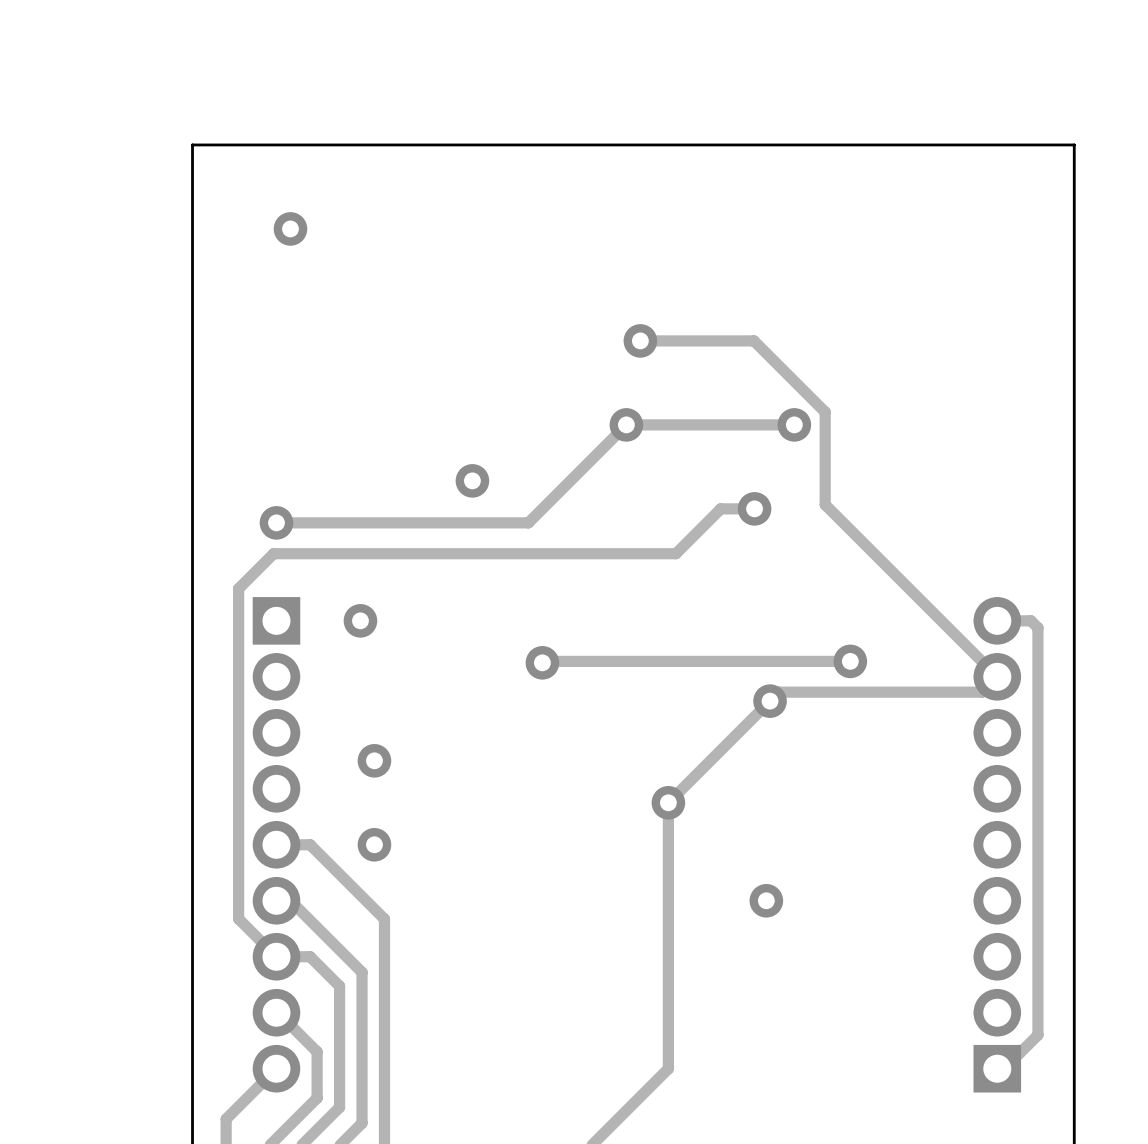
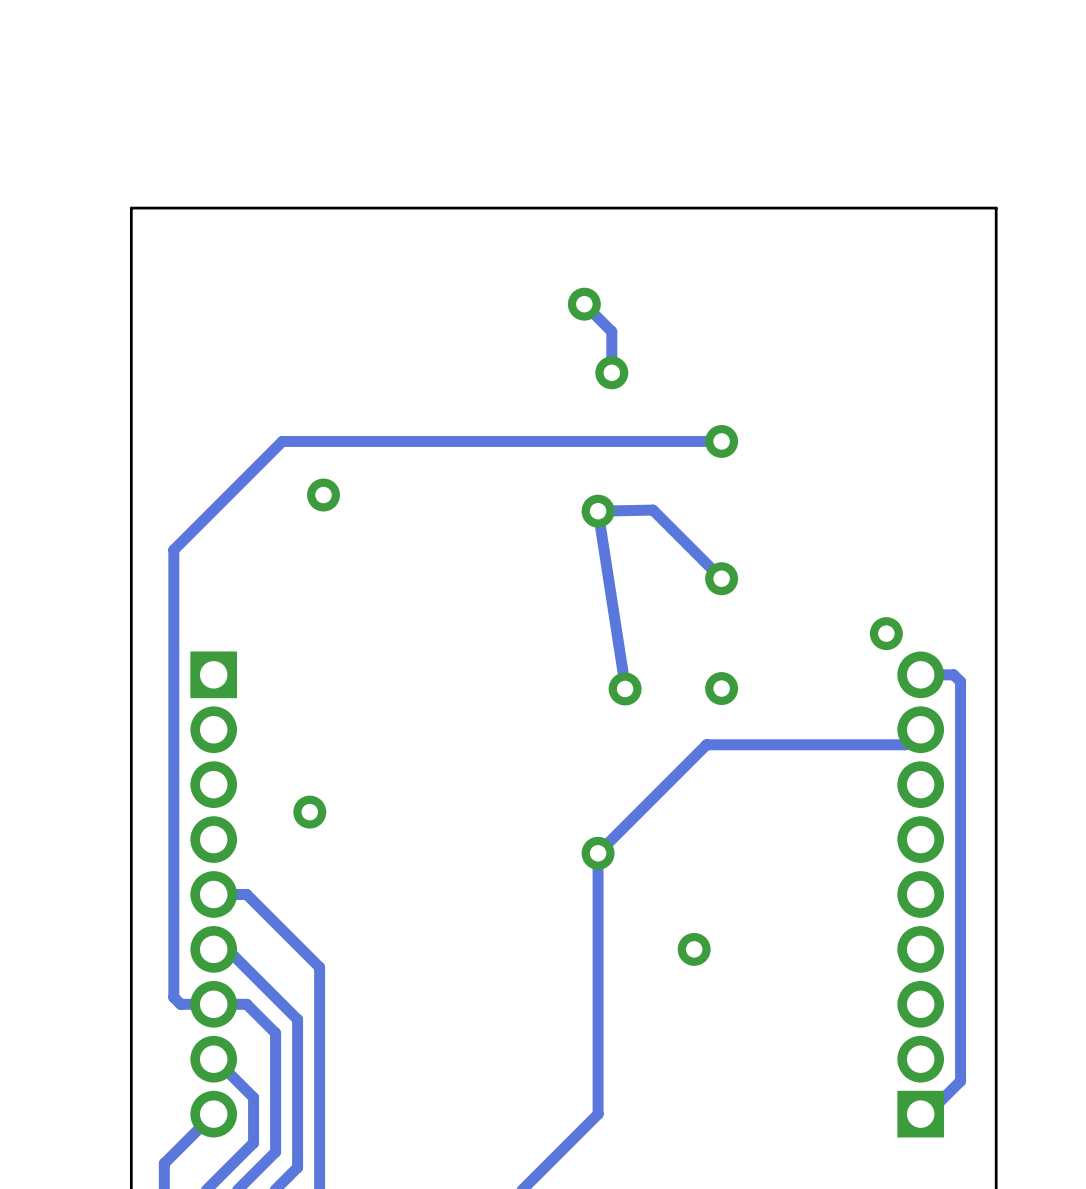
via: (290, 228) -> none
track: none -> (584, 304) (611, 331) (611, 372)
via: none -> (584, 304)
via: none -> (611, 372)
track: (640, 340) (753, 340) (825, 412) (825, 504) (997, 676) -> none
via: (640, 340) -> none
via: (626, 424) -> none
track: (794, 424) (626, 424) (528, 522) (276, 522) -> none
via position: (794, 424) -> (721, 441)
via: none -> (323, 495)
via: none -> (598, 511)
via: (472, 480) -> none
track: (754, 508) (720, 508) (675, 553) (273, 553) (238, 588) (238, 918) (276, 956) -> (721, 441) (282, 441) (173, 549) (173, 997) (180, 1004) (213, 1004)
via position: (754, 508) -> (721, 578)
via: (276, 522) -> none
track: none -> (721, 578) (652, 510) (598, 511) (625, 688)
via: none -> (886, 633)
via: (360, 620) -> none
via: none -> (721, 688)
via: none -> (625, 688)
track: (850, 661) (542, 662) -> none
via: (850, 661) -> none
via: (542, 662) -> none
via: (770, 701) -> none
via: (374, 844) -> none

